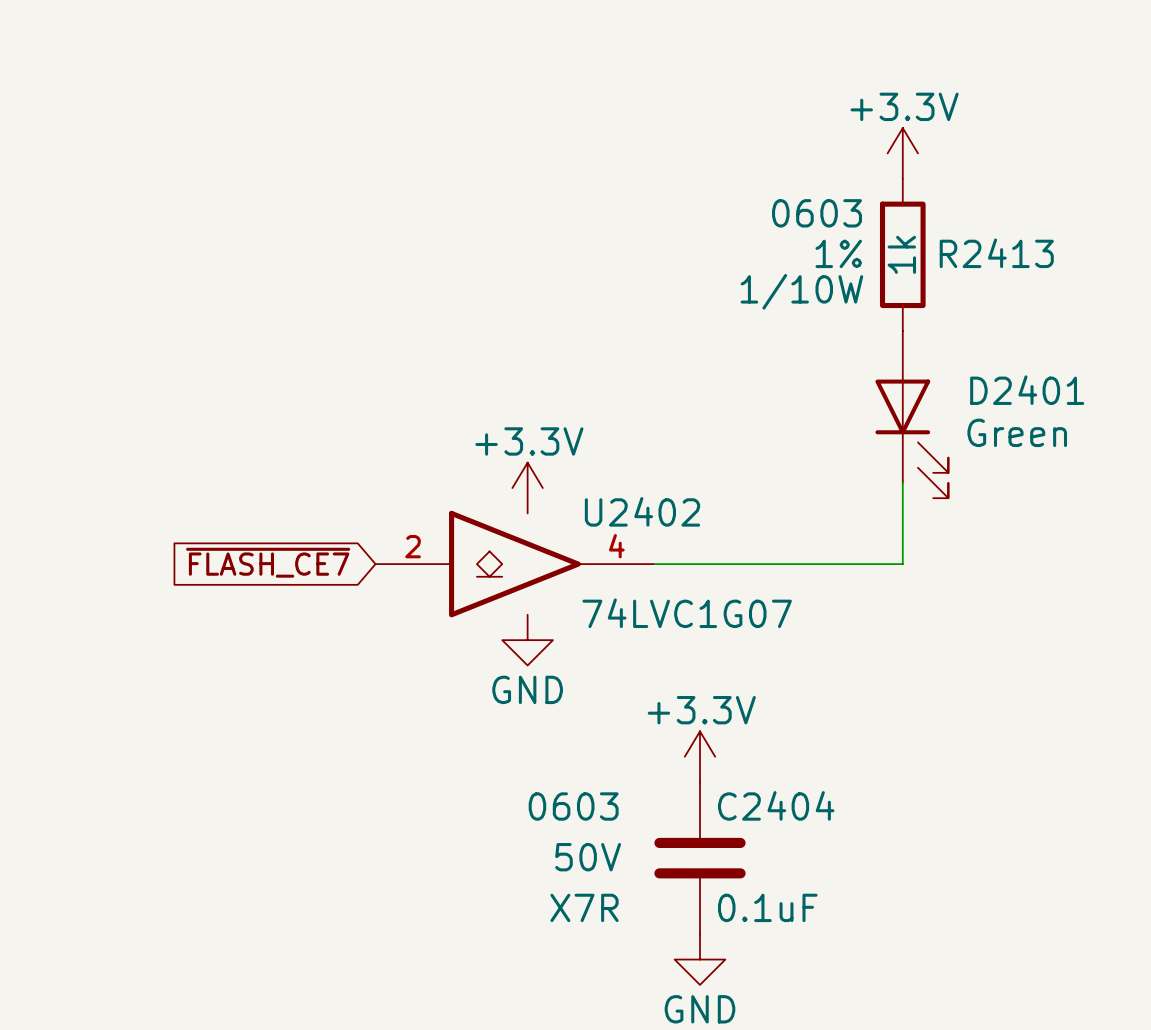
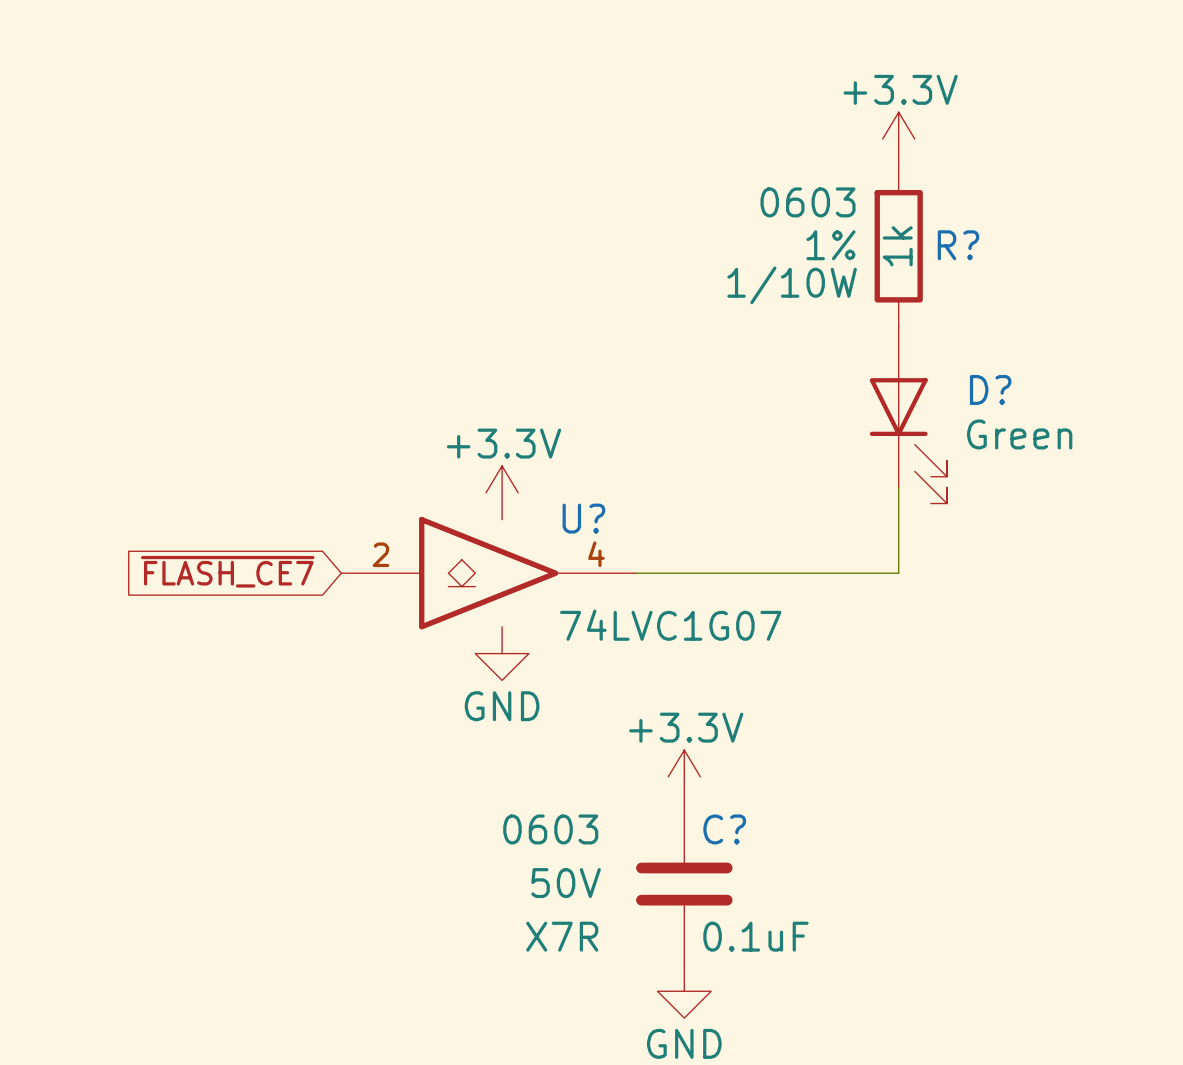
R2413 name: R2413 (996, 253) -> R? (958, 245)
D2401 name: D2401 (1027, 390) -> D? (990, 389)
U2402 name: U2402 (642, 511) -> U? (583, 518)
C2404 name: C2404 (776, 805) -> C? (724, 829)

